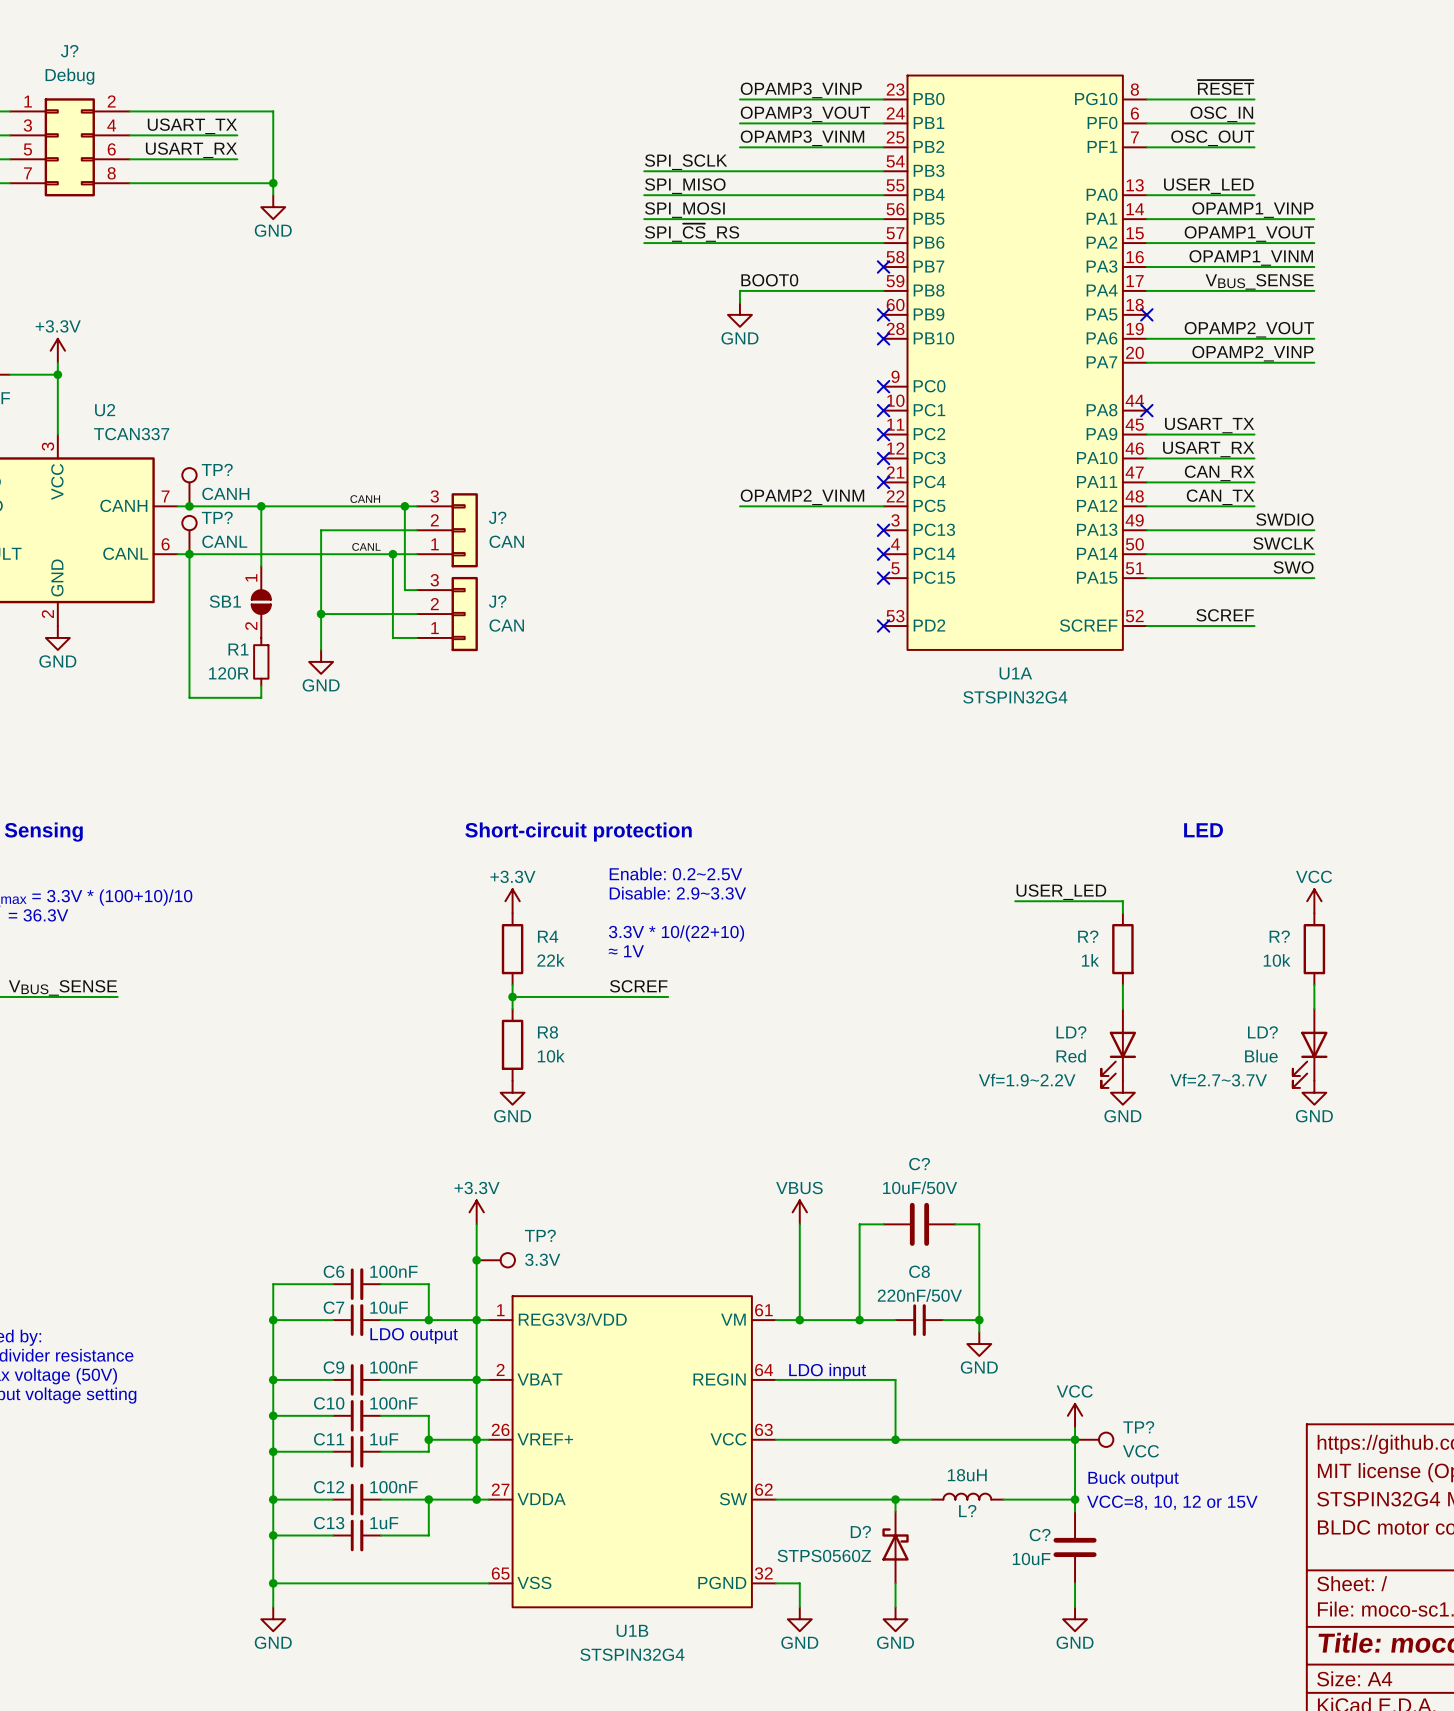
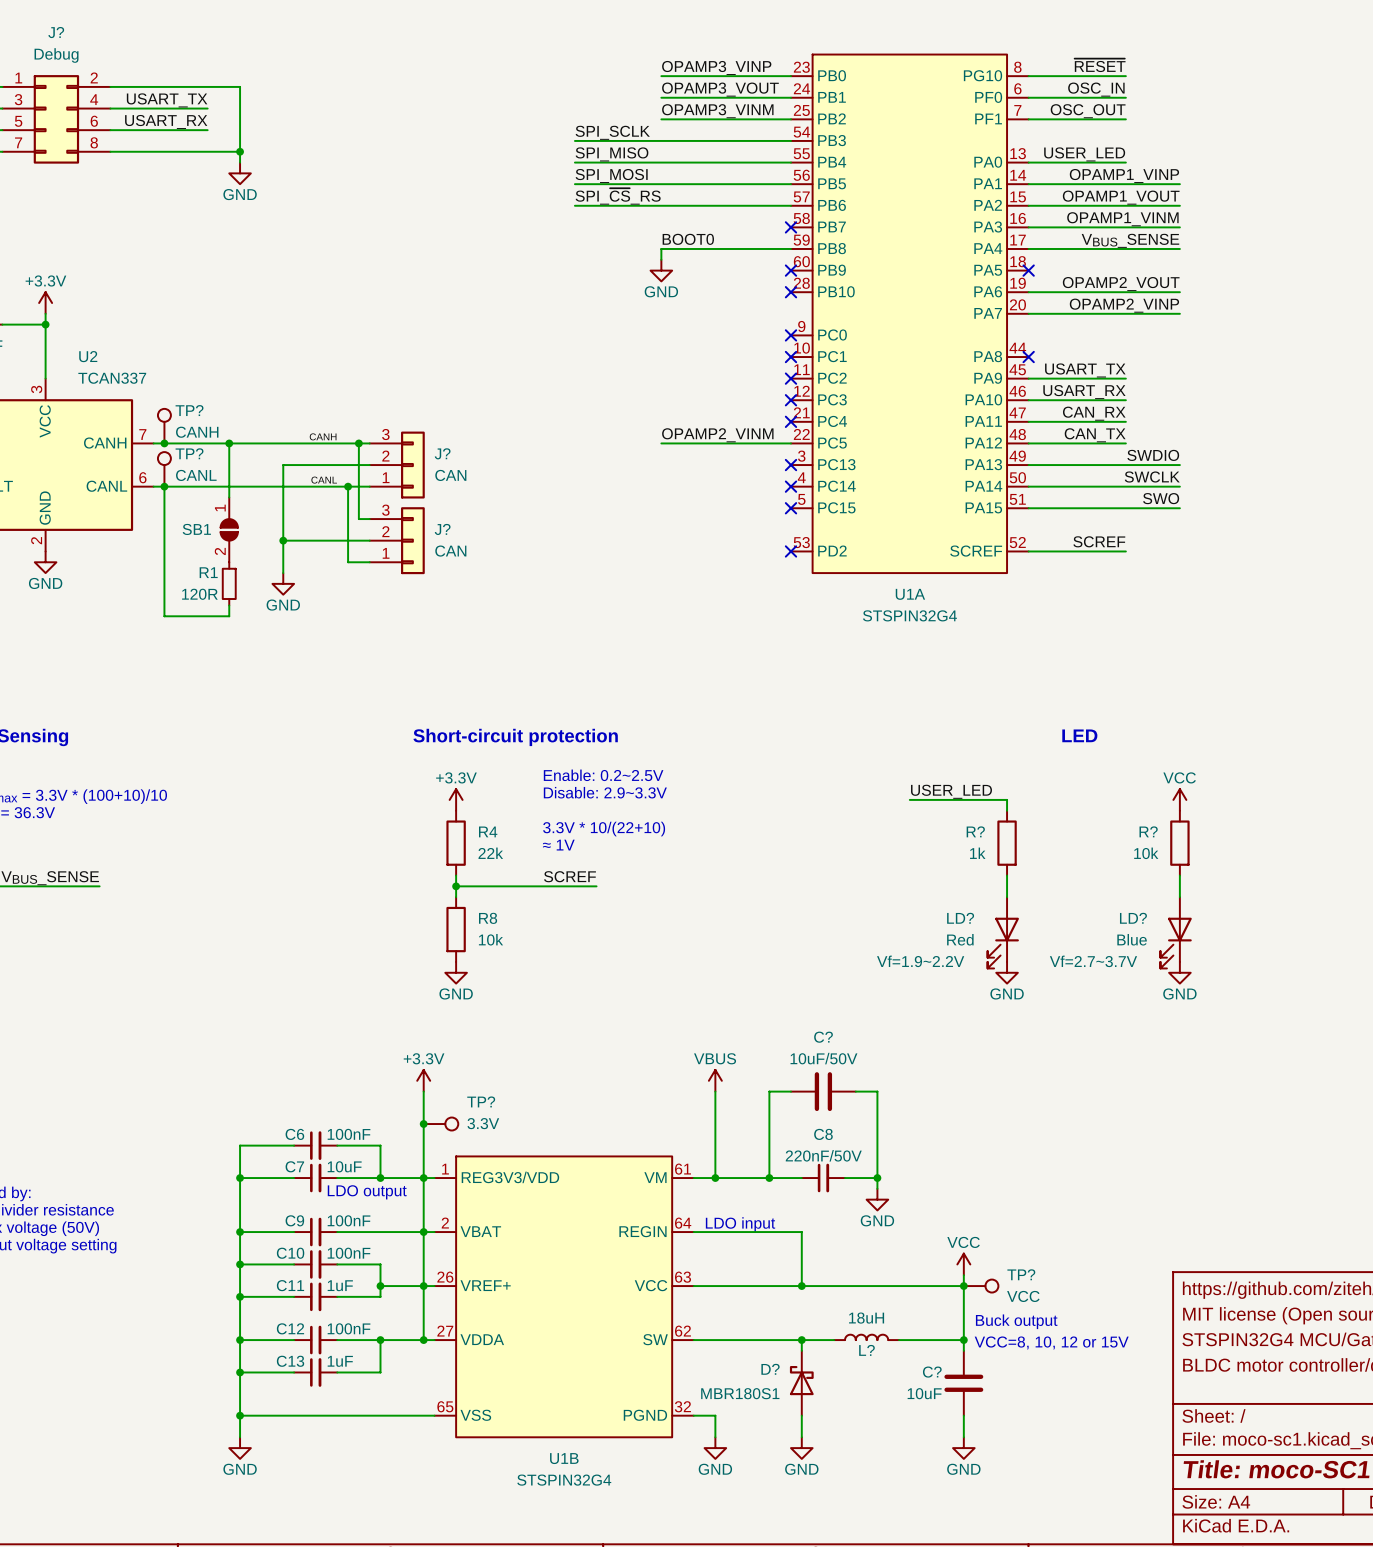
D? value: STPS0560Z (824, 1555) -> MBR180S1 (740, 1393)

